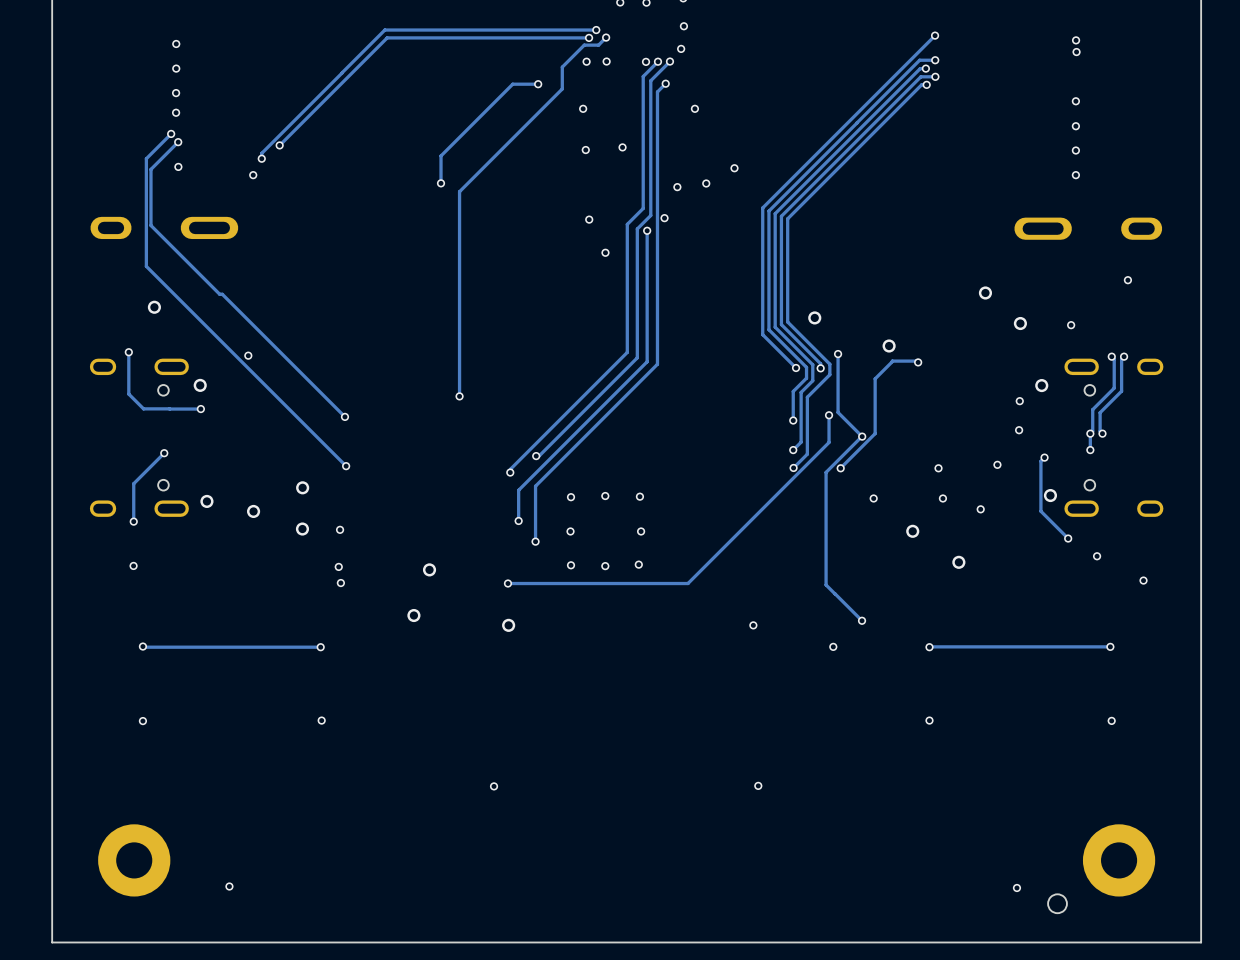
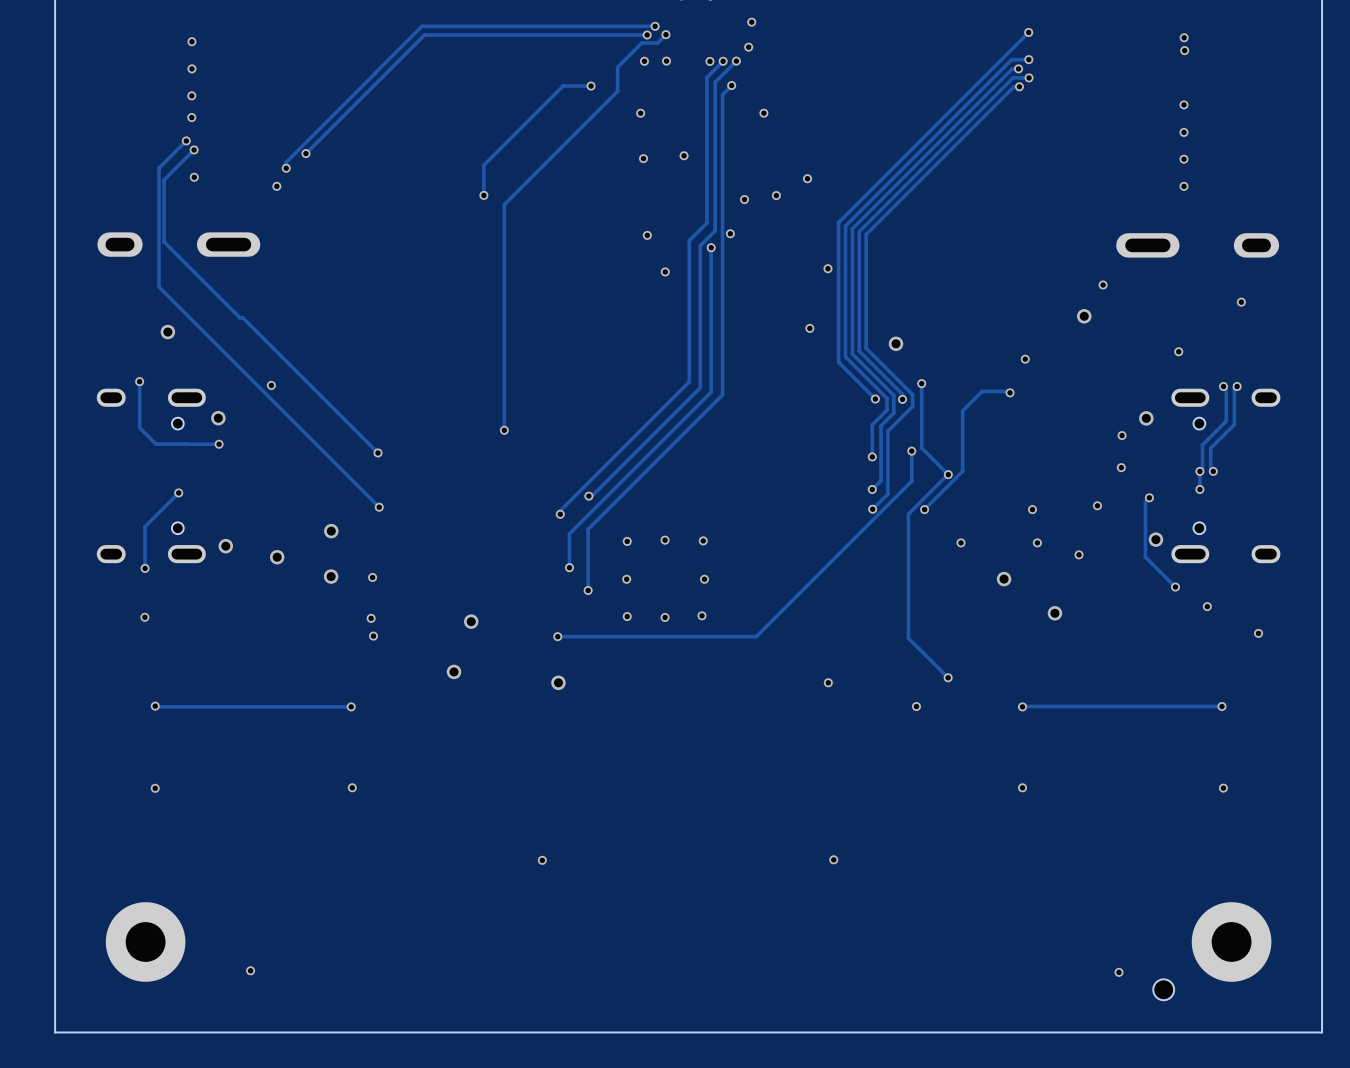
via: none -> (827, 268)
via: none -> (1103, 284)
via: none -> (809, 328)
via: (1020, 323) -> none
via: none -> (1025, 359)
via: (889, 346) -> none

